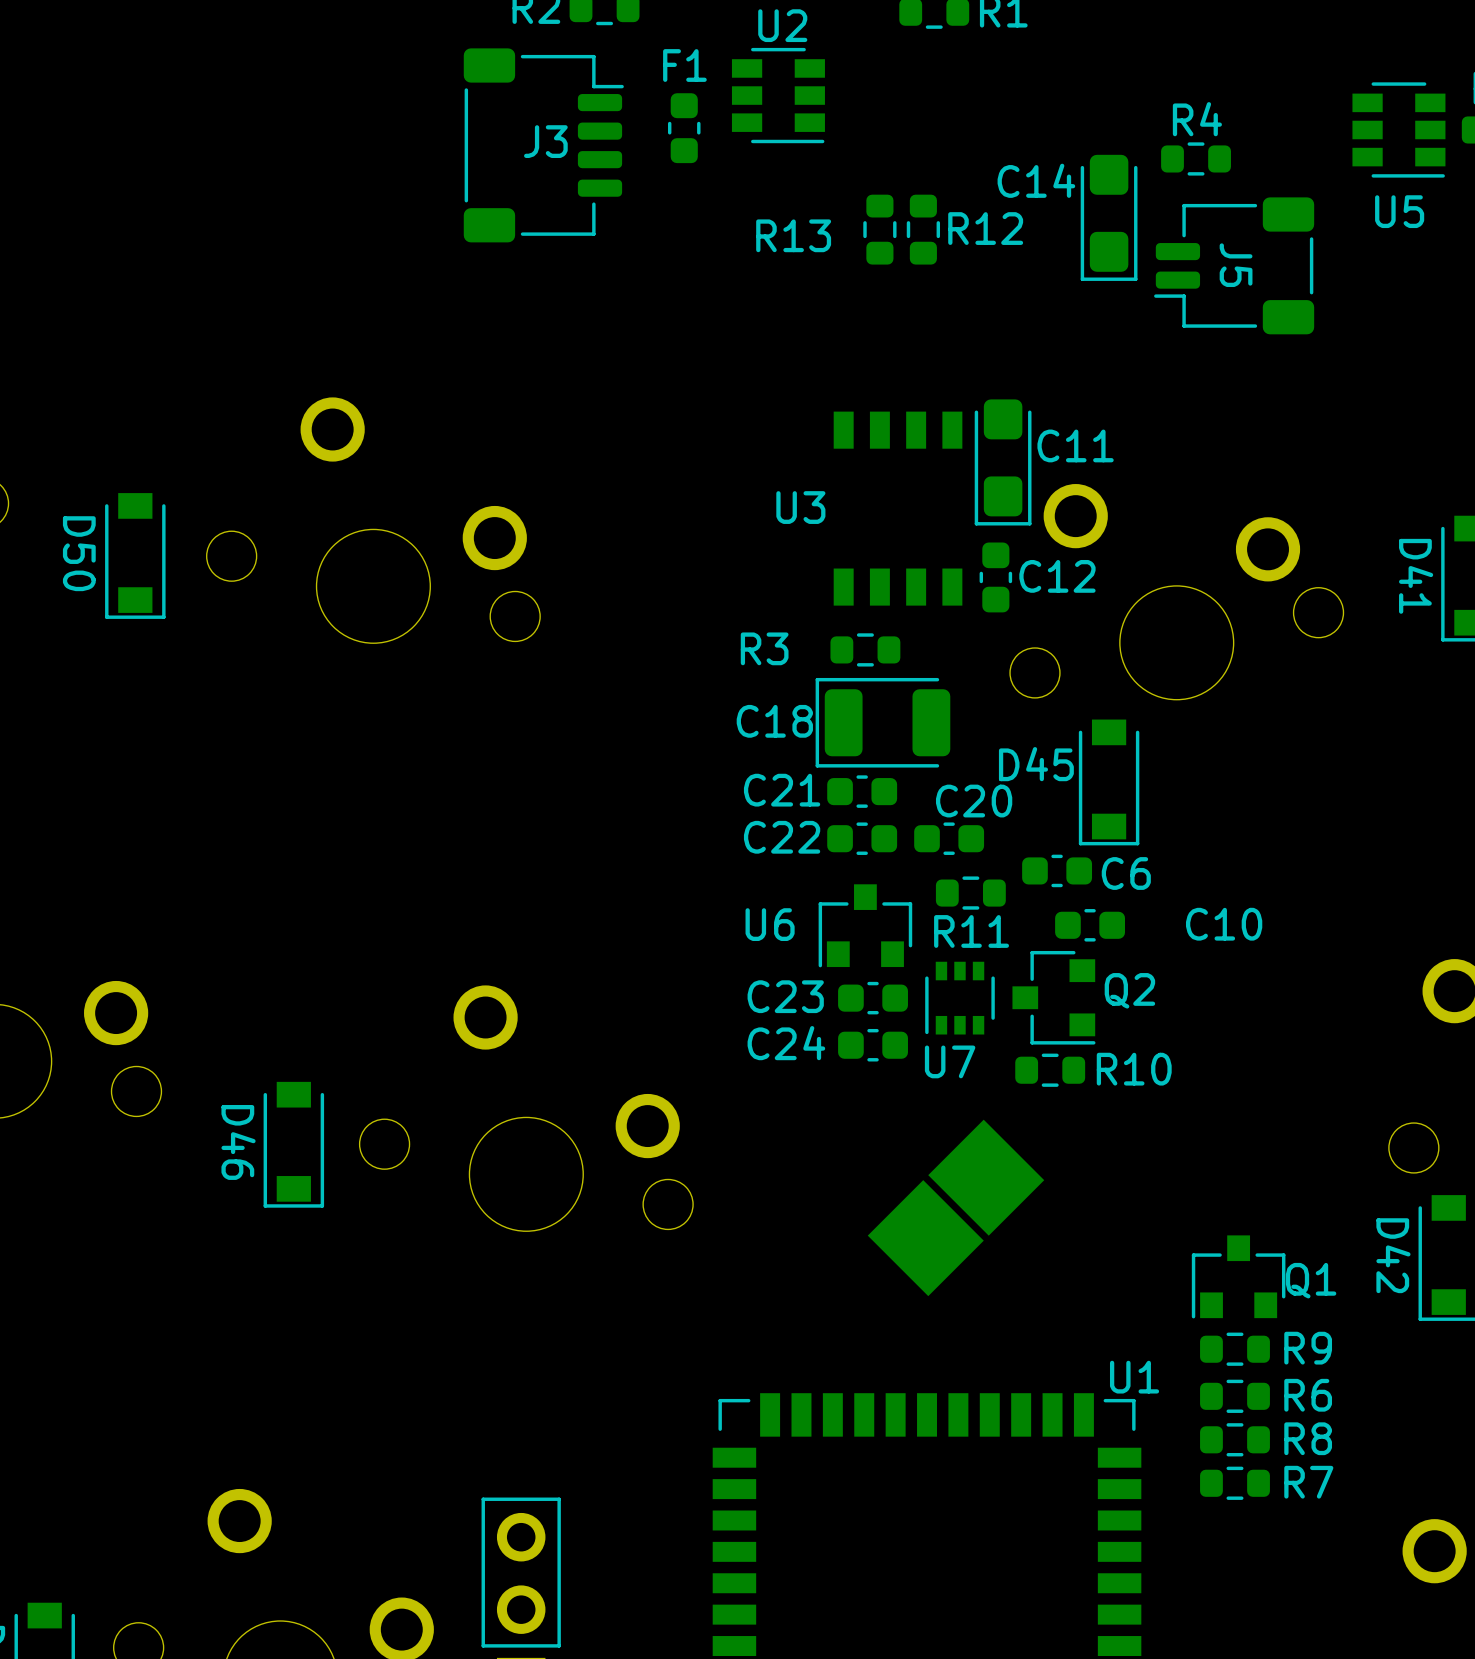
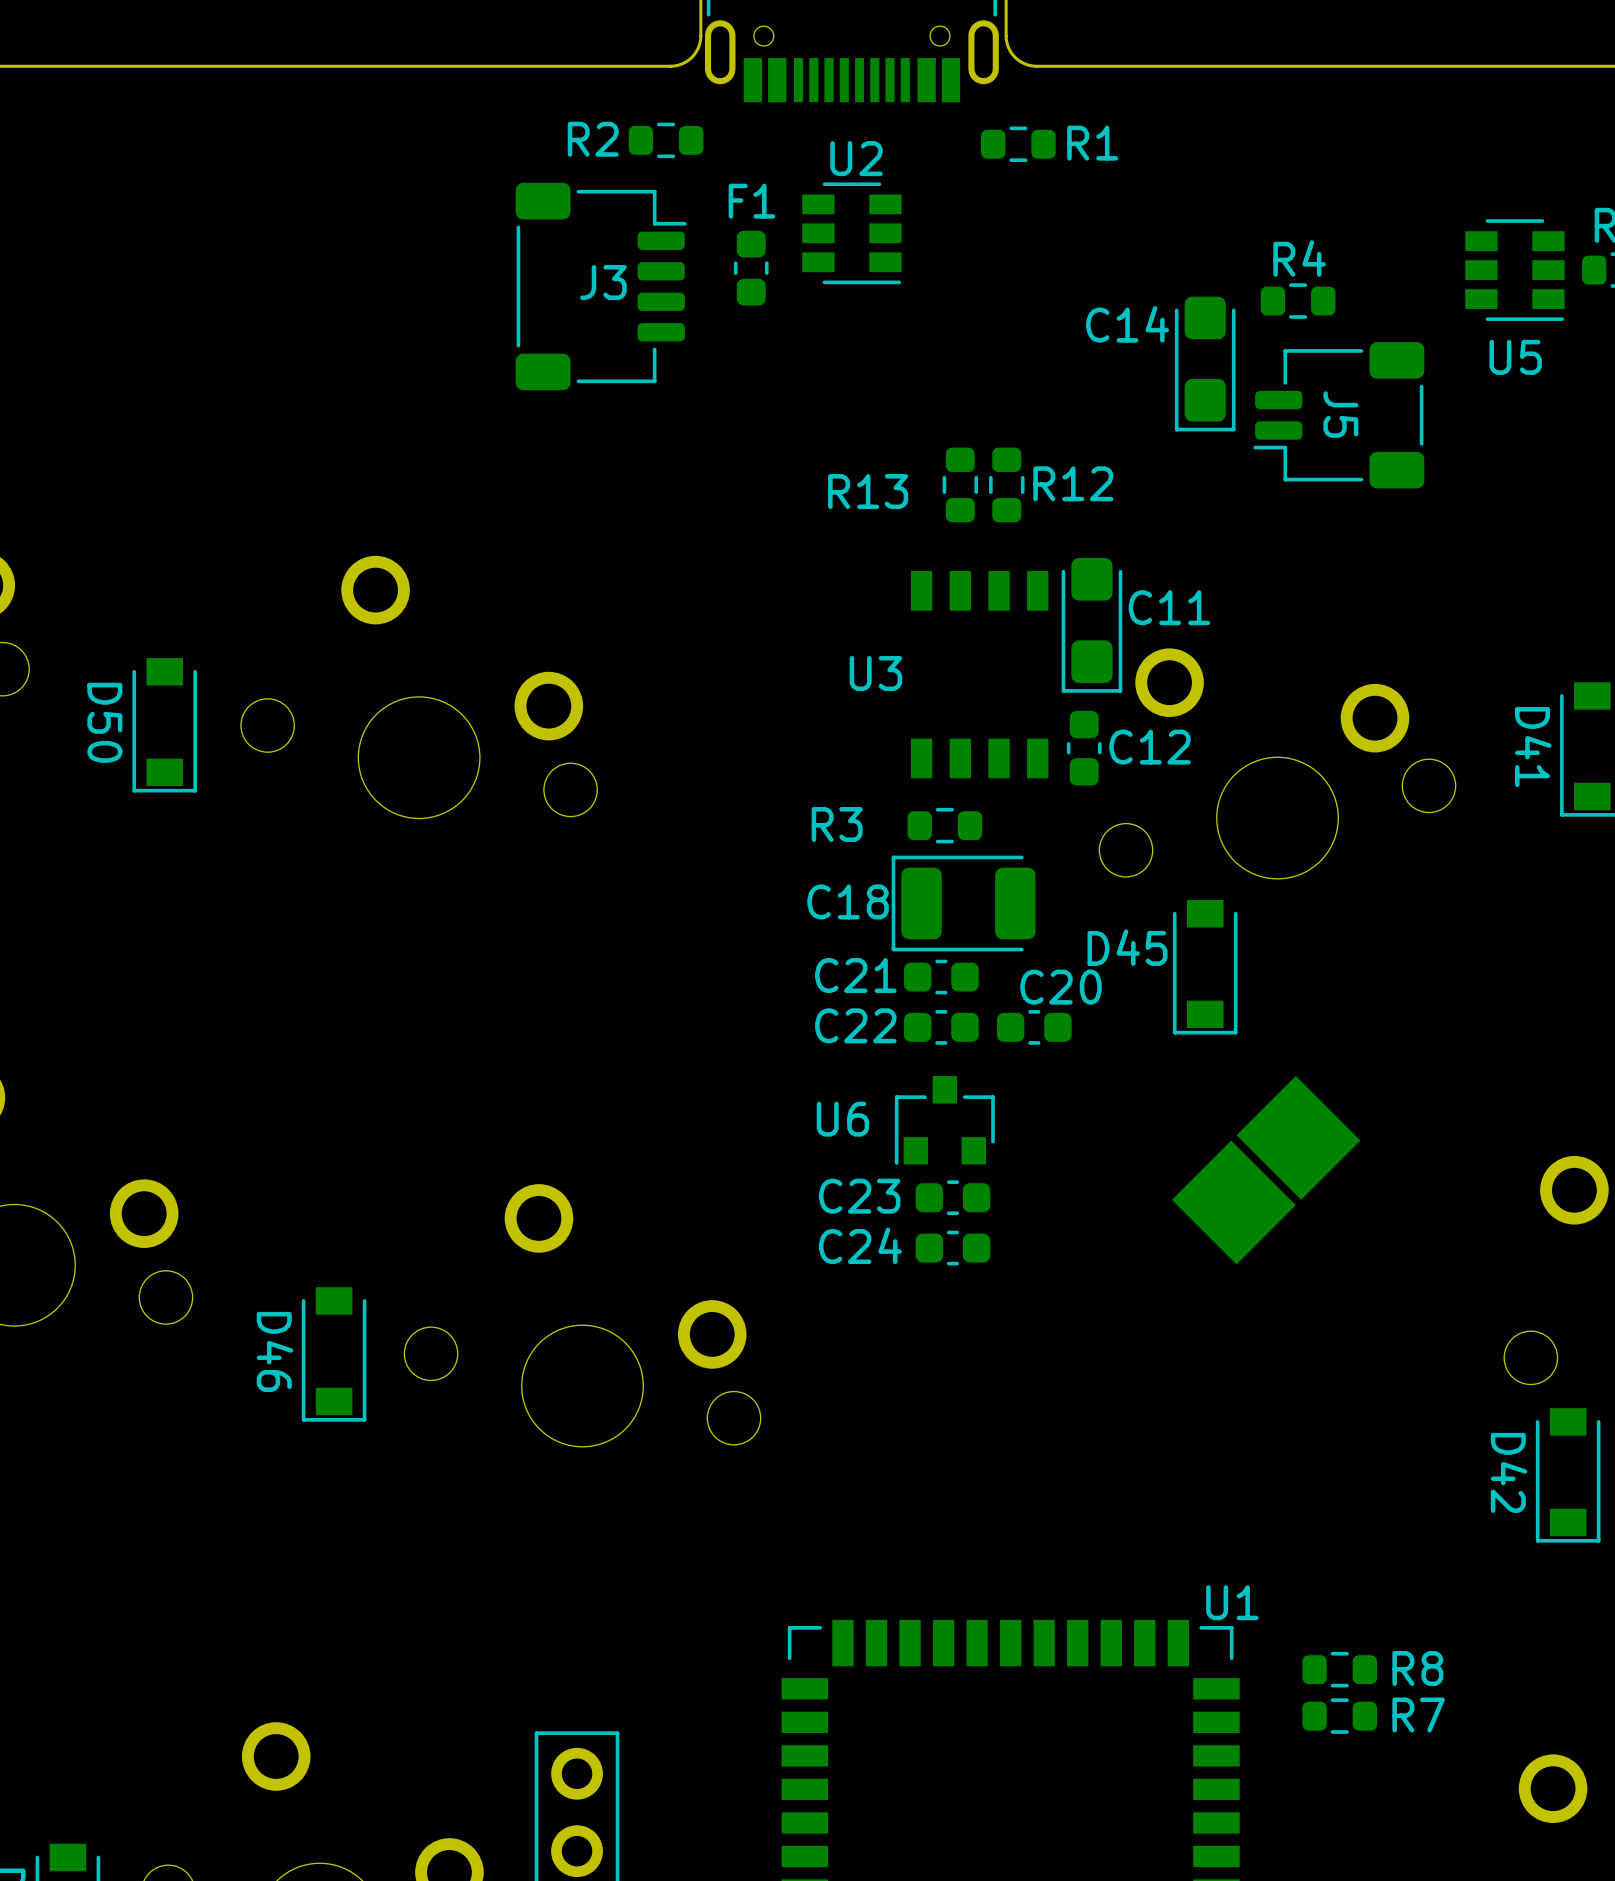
R13 position: (879, 229) -> (960, 484)
R12 position: (923, 229) -> (1006, 484)
C6: (1057, 870) -> none
R11: (970, 893) -> none
C10: (1090, 925) -> none
Q2: (1053, 997) -> none
U7: (959, 998) -> none
R10: (1050, 1070) -> none
part position: (956, 1207) -> (1266, 1170)
Q1: (1238, 1276) -> none
R9: (1234, 1349) -> none
R6: (1234, 1396) -> none

